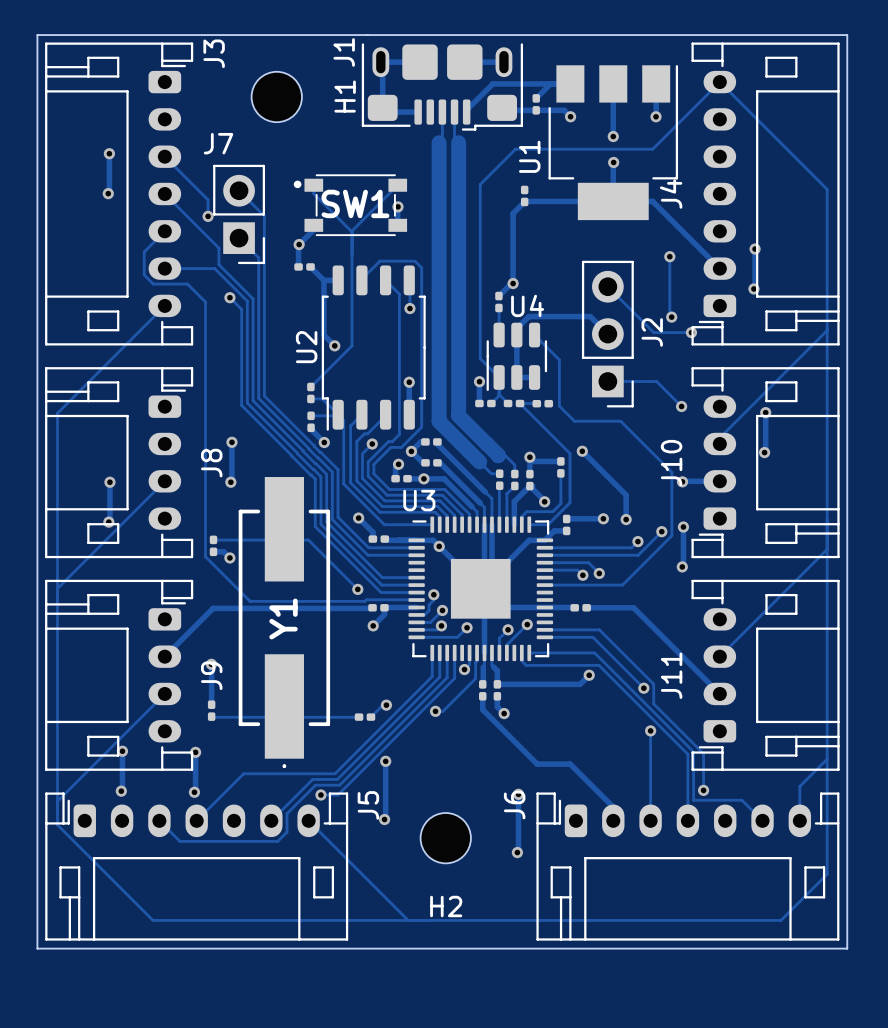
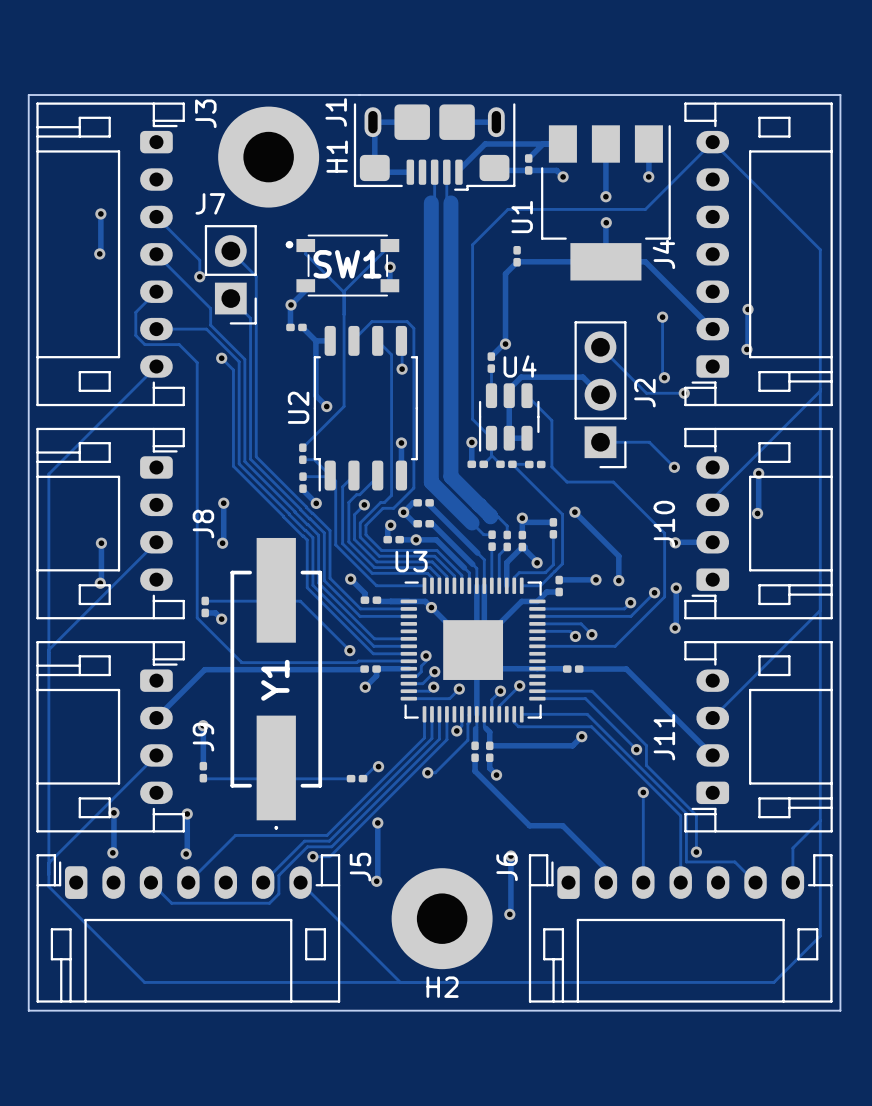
H1 footprint: [251, 71, 302, 123] -> [218, 106, 320, 208]
H2 footprint: [420, 812, 471, 864] -> [391, 868, 493, 970]

